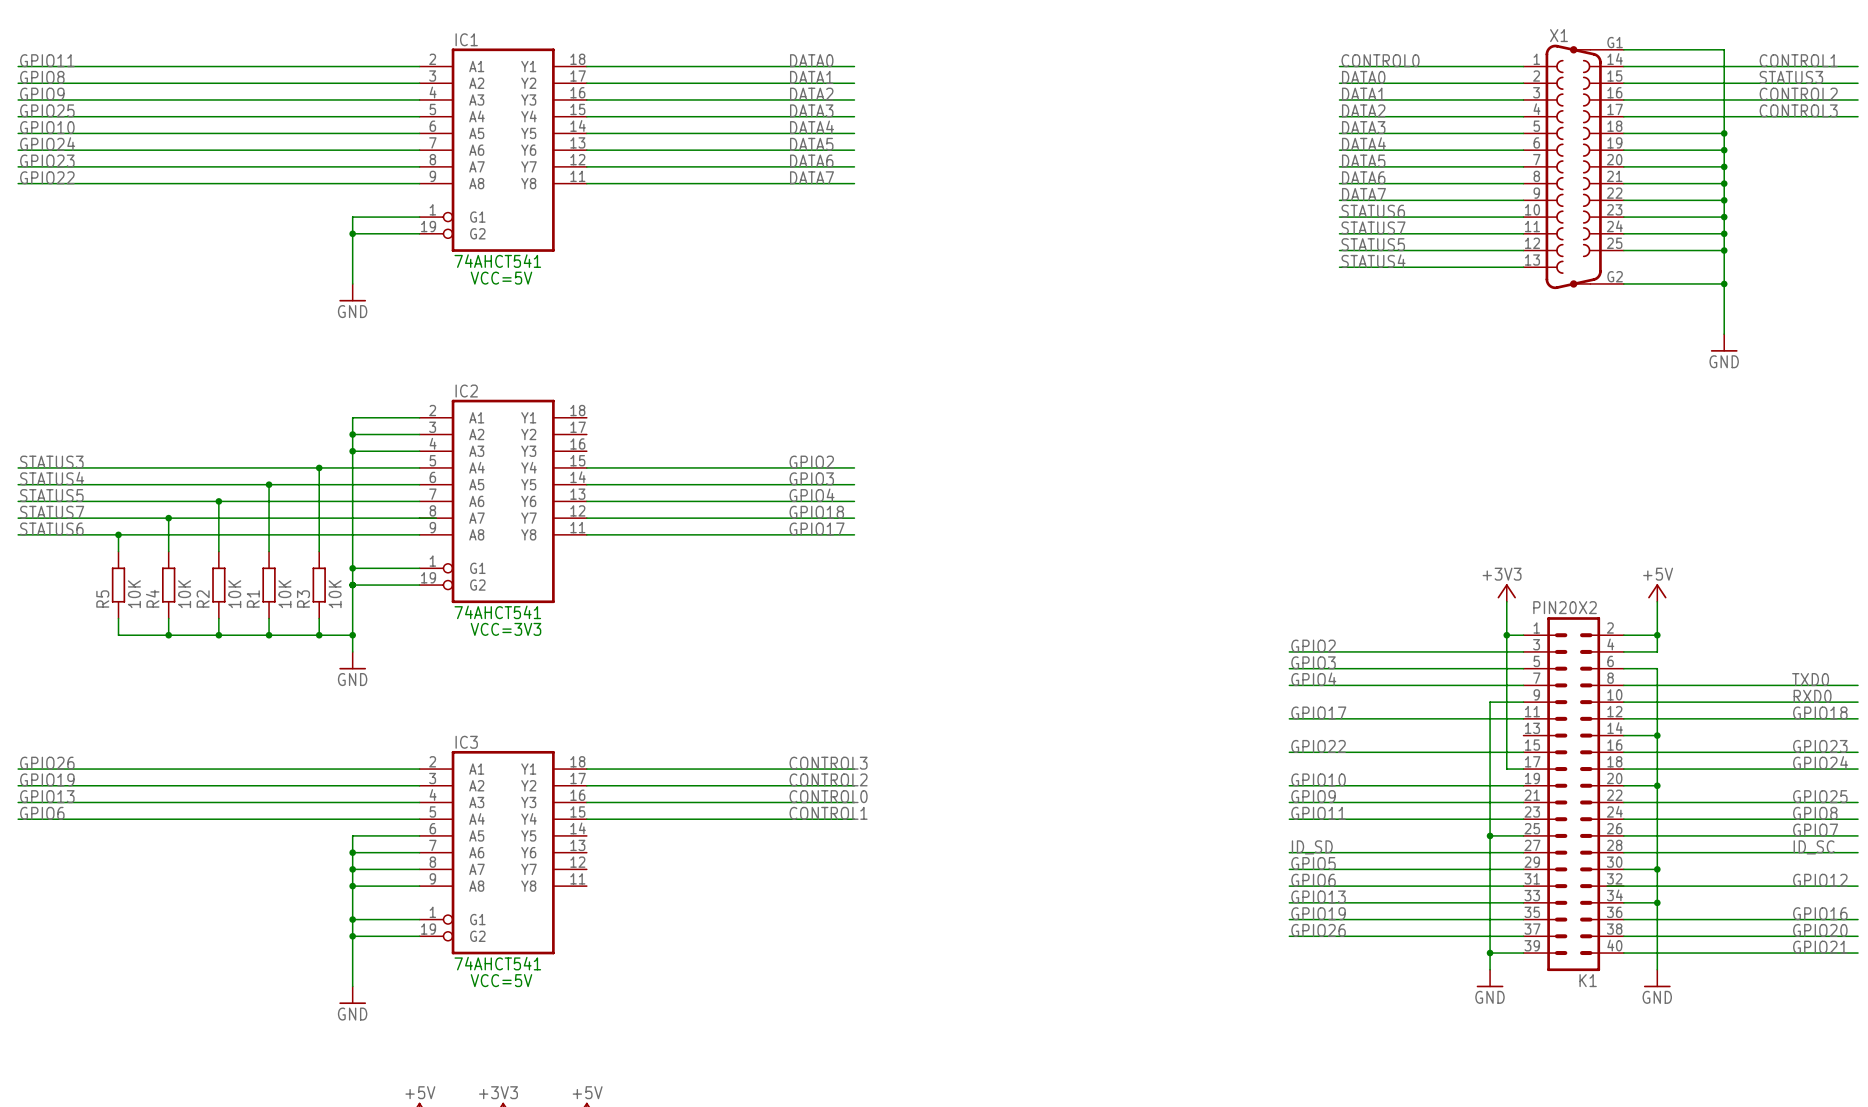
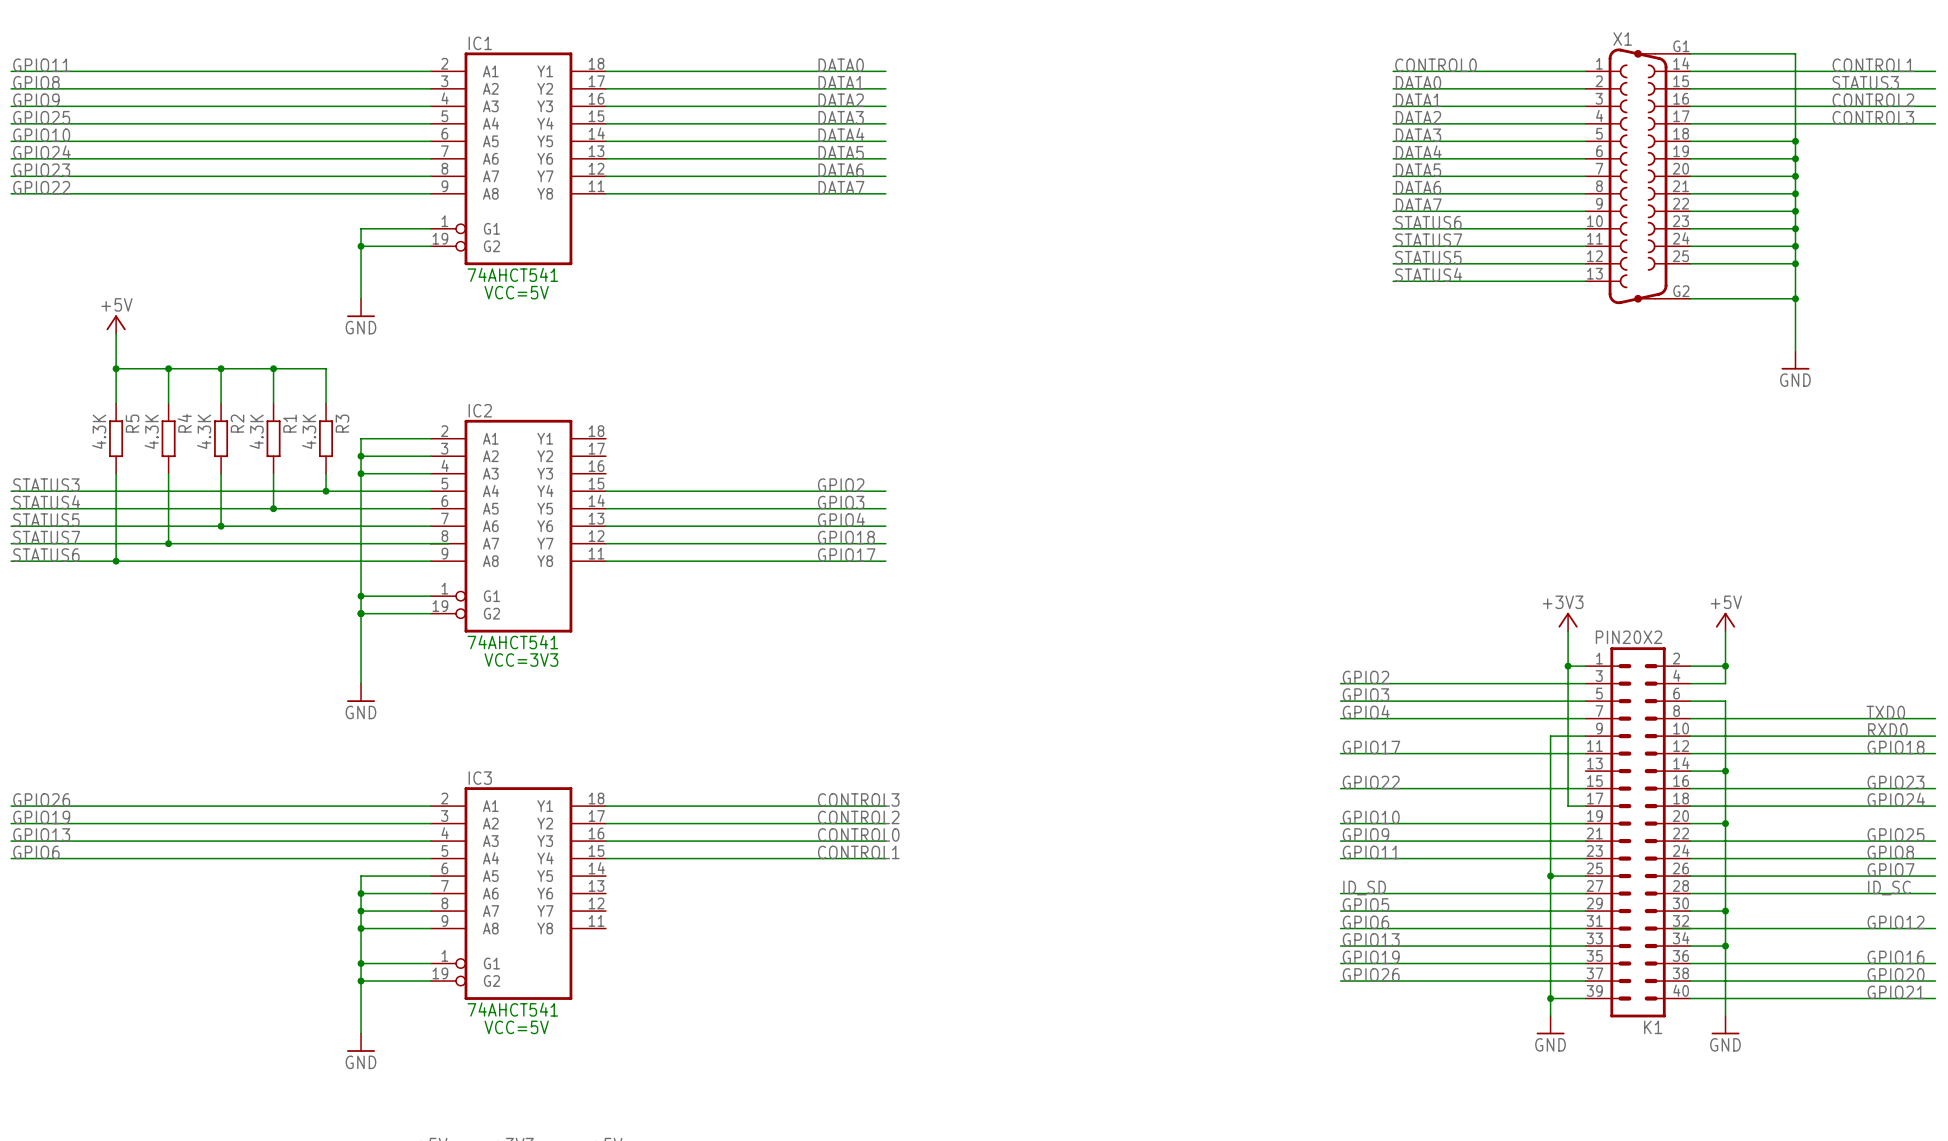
power symbol: none -> +5V (116, 324)
wire: none -> (116, 333) (116, 403)
wire: none -> (116, 368) (326, 368) (326, 403)
junction: none -> (116, 368)
wire: none -> (168, 368) (168, 403)
junction: none -> (168, 368)
wire: none -> (221, 368) (221, 403)
junction: none -> (221, 368)
wire: none -> (273, 368) (273, 403)
junction: none -> (273, 368)
wire: (319, 467) (319, 551) -> (326, 491) (326, 473)
wire: (269, 484) (269, 551) -> (273, 508) (273, 473)
wire: (218, 501) (218, 551) -> (221, 526) (221, 473)
wire: (168, 518) (168, 551) -> (168, 543) (168, 473)
wire: (118, 534) (118, 551) -> (116, 561) (116, 473)
R5 position: (118, 585) -> (116, 438)
R4 position: (168, 585) -> (168, 438)
R2 position: (218, 585) -> (221, 438)
R1 position: (269, 585) -> (273, 438)
R3 position: (319, 585) -> (326, 438)
R5 value: 10K (134, 594) -> 4.3K (99, 431)
R4 value: 10K (184, 594) -> 4.3K (151, 431)
R2 value: 10K (234, 594) -> 4.3K (204, 431)
R1 value: 10K (284, 594) -> 4.3K (256, 431)
R3 value: 10K (335, 594) -> 4.3K (309, 431)
R5 name position: R5 (102, 598) -> R5 (132, 423)
R4 name position: R4 (152, 598) -> R4 (184, 423)
R2 name position: R2 (203, 598) -> R2 (237, 423)
R1 name position: R1 (253, 598) -> R1 (289, 423)
R3 name position: R3 (303, 598) -> R3 (342, 423)
wire: (118, 618) (118, 635) (352, 635) -> none
wire: (168, 618) (168, 635) -> none
wire: (218, 618) (218, 635) -> none
wire: (269, 618) (269, 635) -> none
wire: (319, 618) (319, 635) -> none
junction: (168, 635) -> none
junction: (218, 635) -> none
junction: (269, 635) -> none
junction: (319, 635) -> none
junction: (352, 635) -> none

